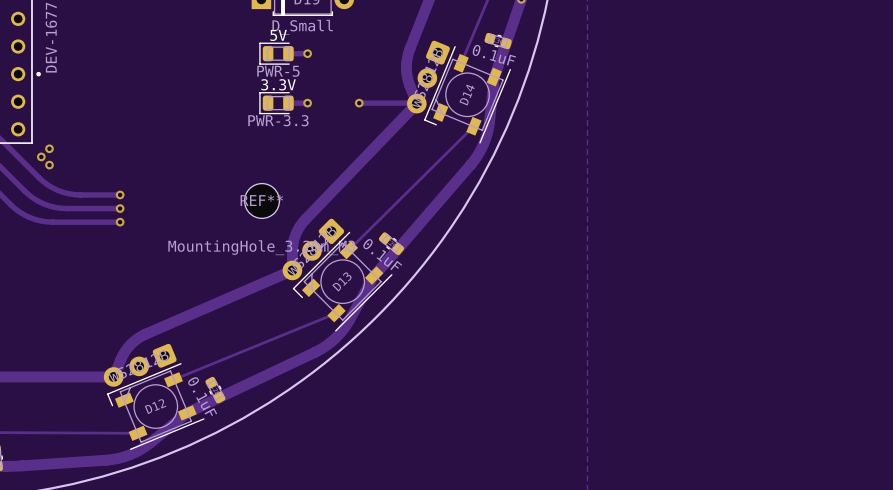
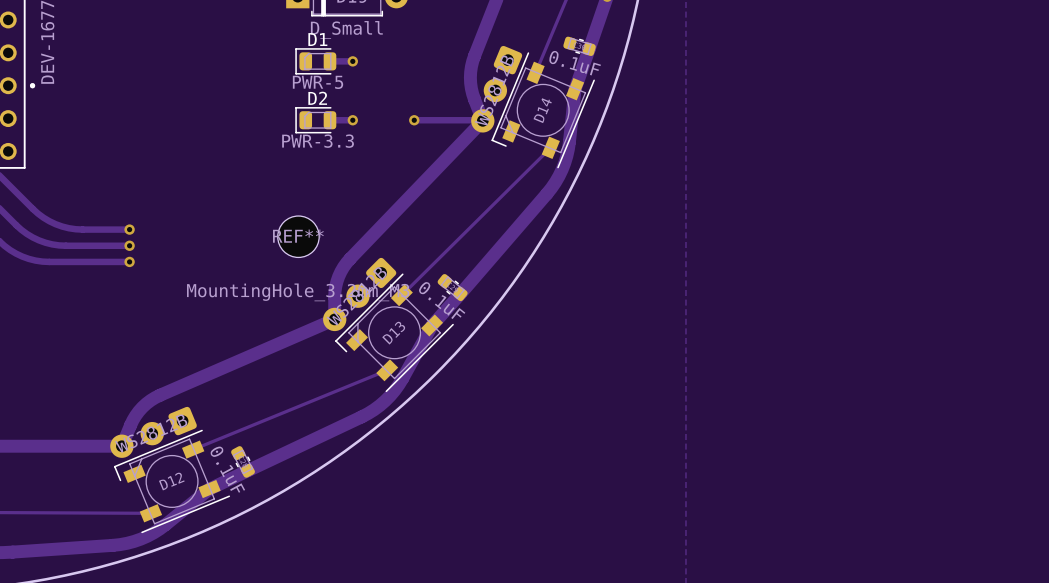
5V name: 5V (278, 35) -> D1 (317, 39)
3.3V name: 3.3V (278, 84) -> D2 (317, 98)
via: (49, 148) -> none
via: (41, 156) -> none
via: (49, 165) -> none

